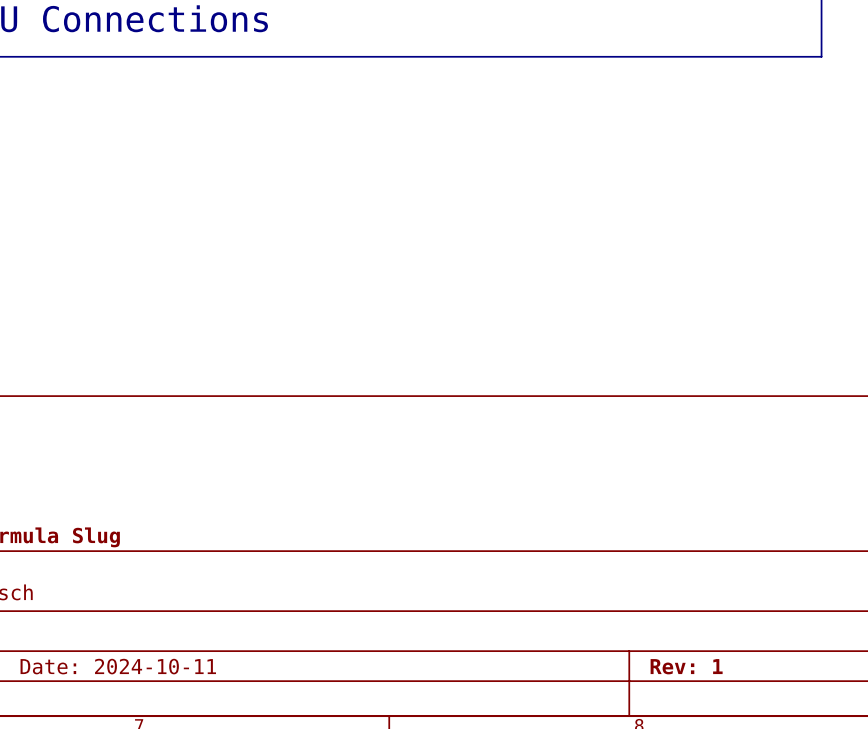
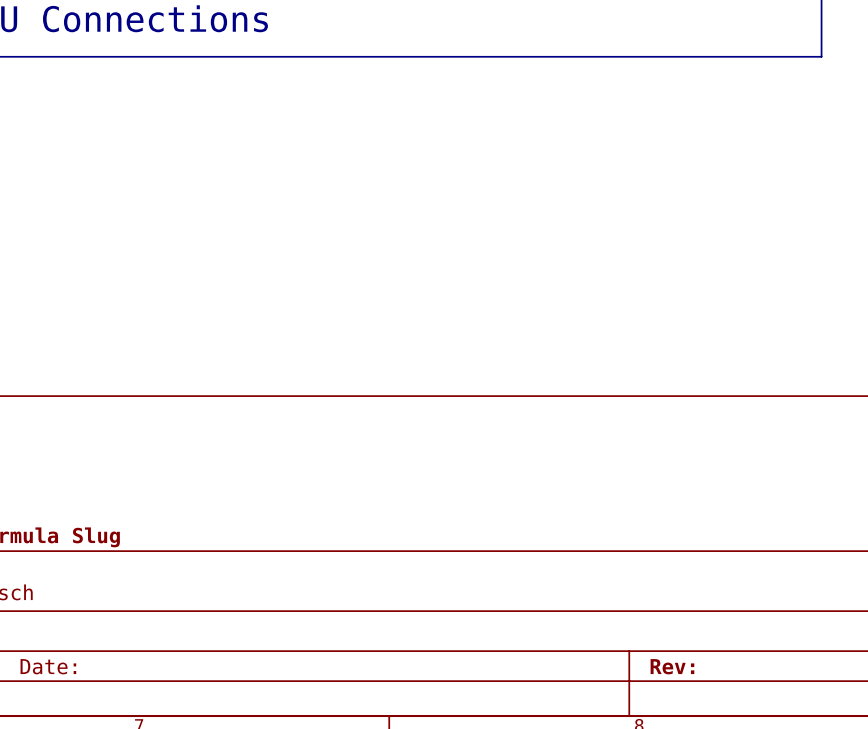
title block: Date: 2024-10-11 (118, 666) -> Date: (48, 666)
title block: Rev: 1 (686, 666) -> Rev: (672, 666)

